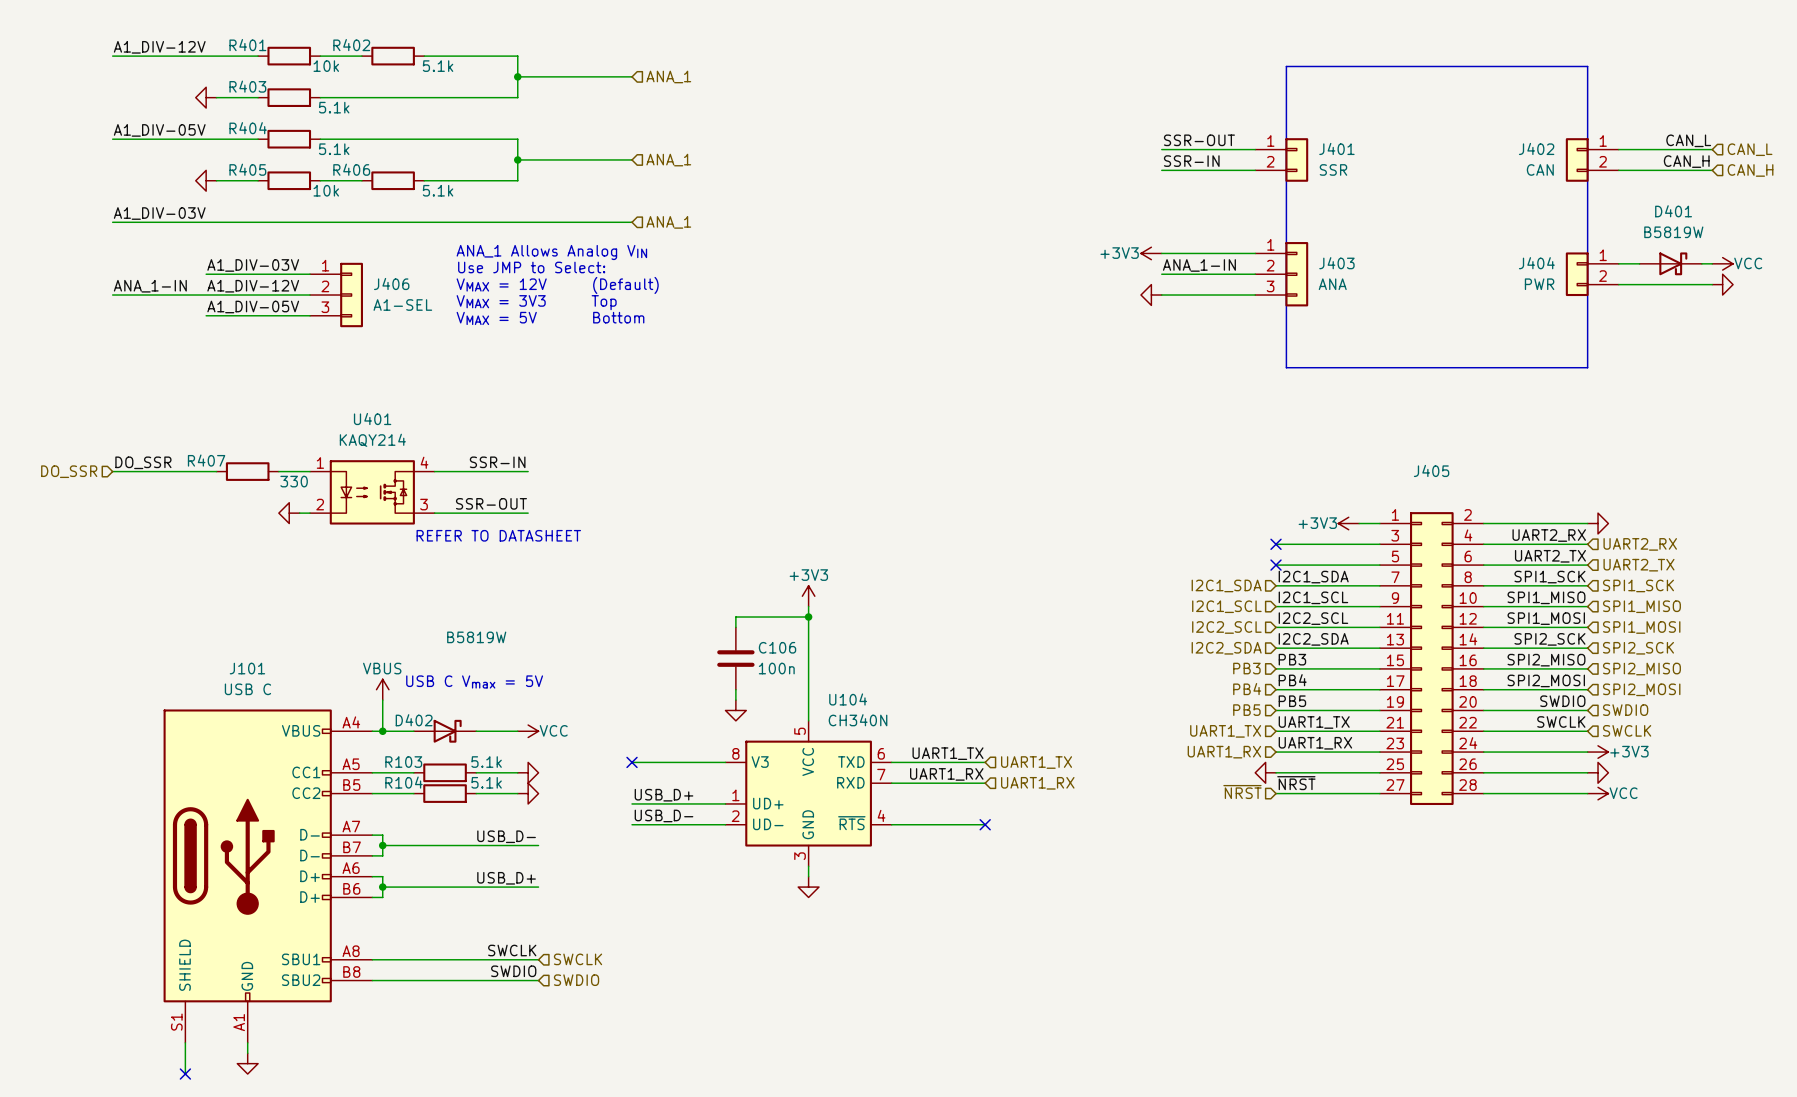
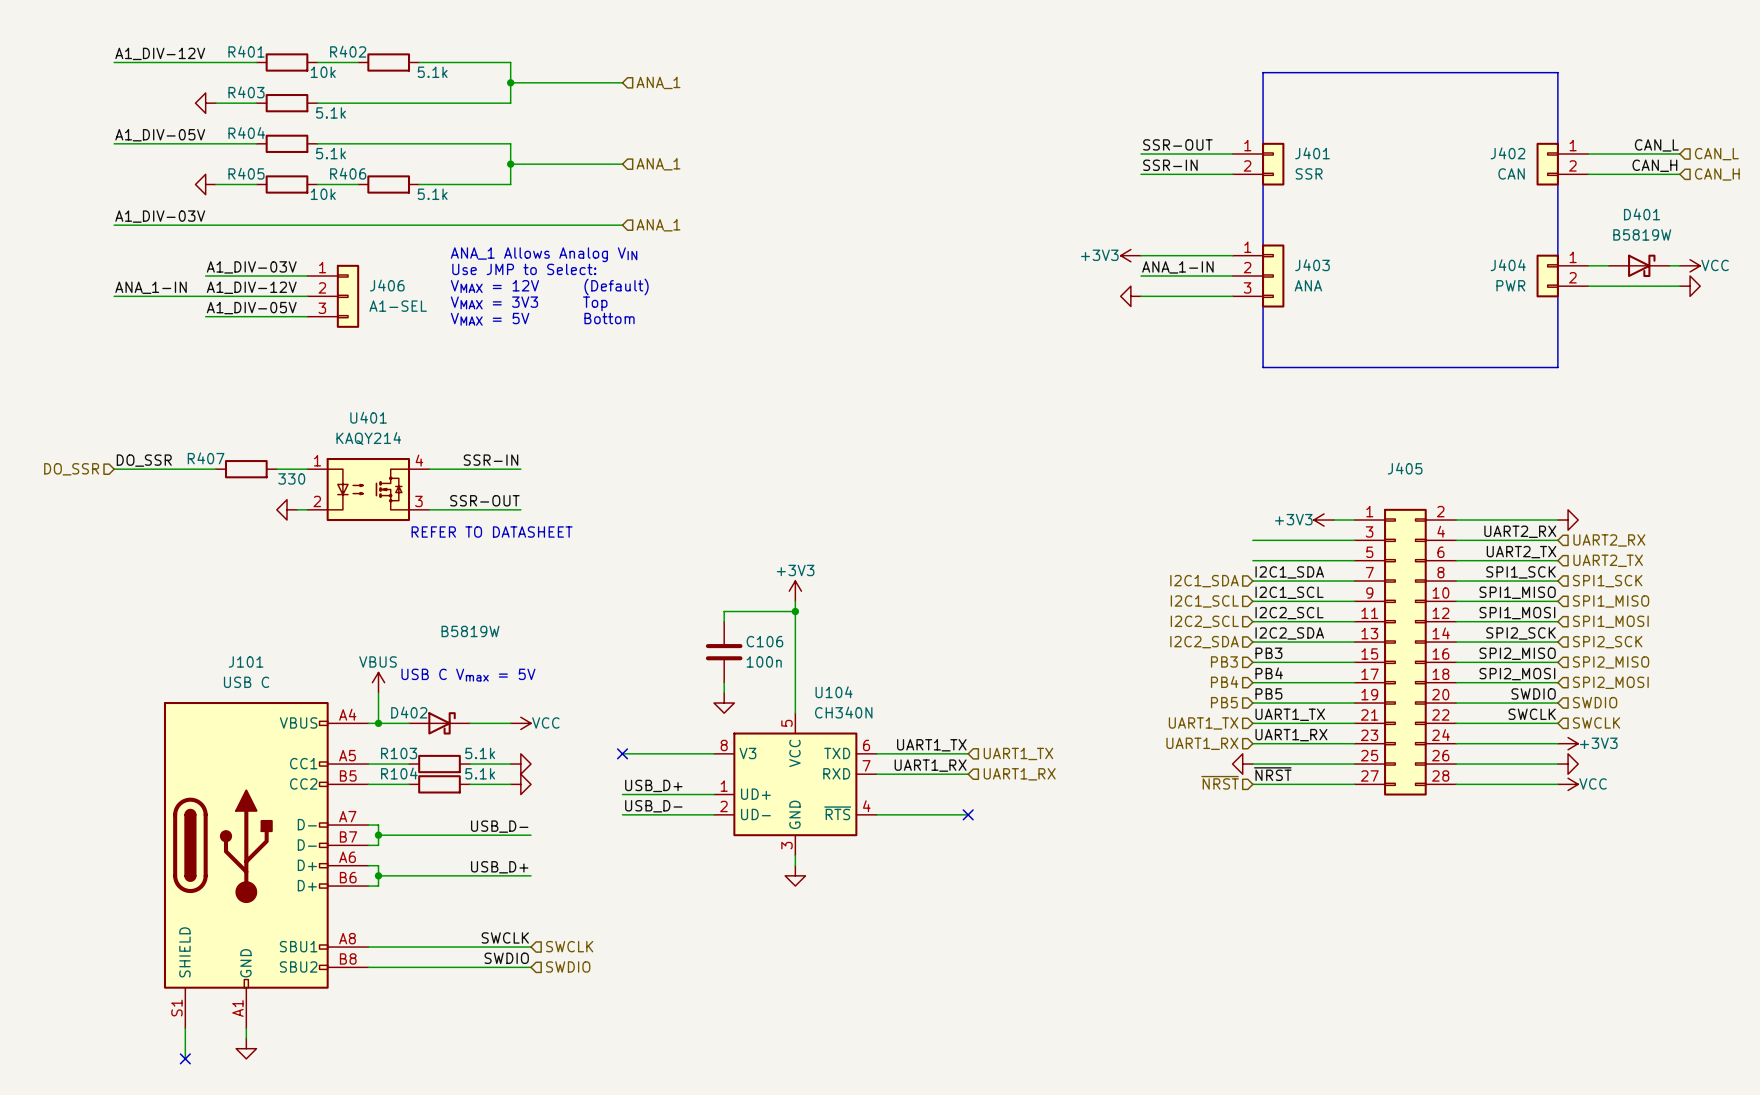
no-connect mark: (1276, 544) -> none
no-connect mark: (1276, 565) -> none

